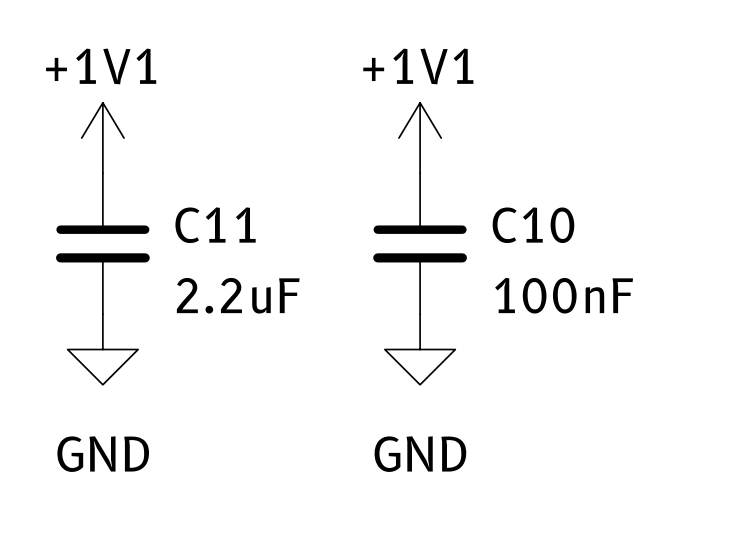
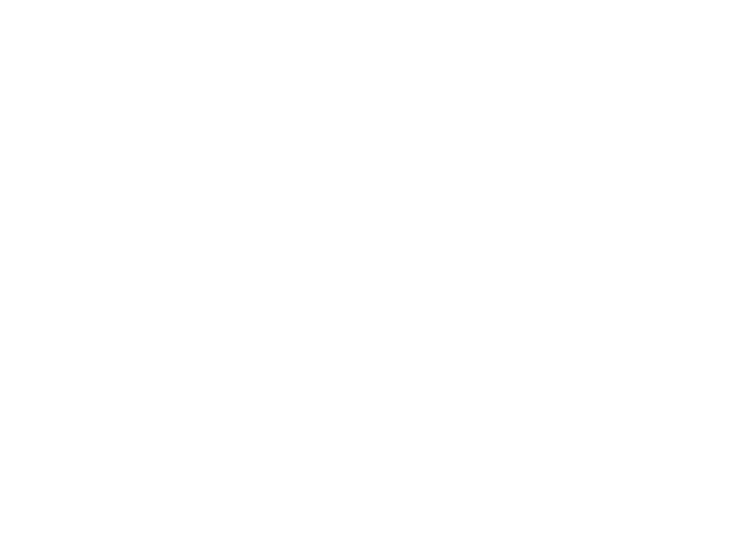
power symbol: +1V1 (102, 138) -> none
power symbol: +1V1 (420, 138) -> none
C11: 2.2uF (102, 243) -> none
C10: 100nF (420, 243) -> none
power symbol: GND (102, 349) -> none
power symbol: GND (420, 349) -> none

